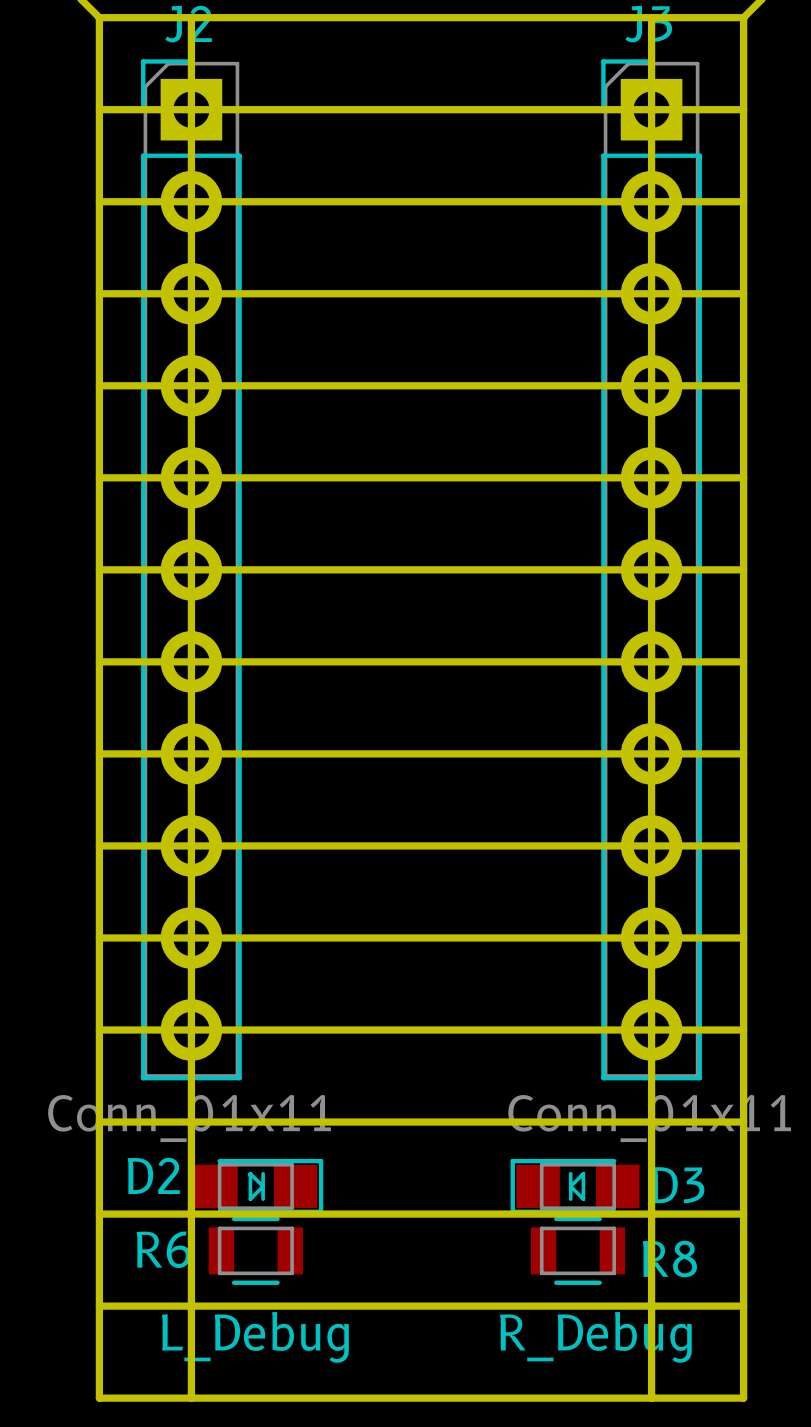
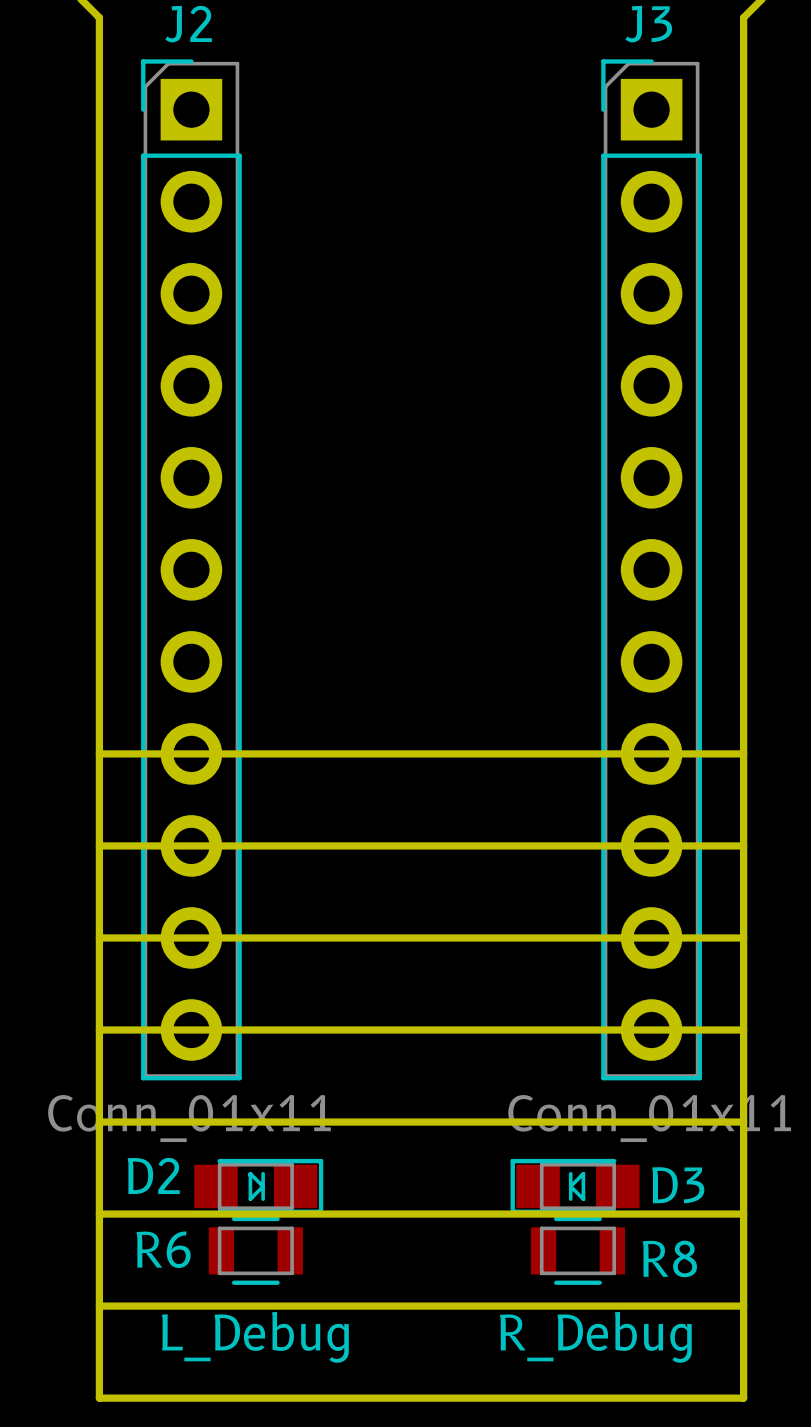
board edge: (99, 17) (743, 17) -> none
board edge: (191, 17) (191, 1398) -> none
board edge: (651, 17) (651, 1398) -> none
board edge: (99, 109) (743, 109) -> none
board edge: (99, 201) (743, 201) -> none
board edge: (99, 293) (743, 293) -> none
board edge: (99, 385) (743, 385) -> none
board edge: (99, 477) (743, 477) -> none
board edge: (99, 569) (743, 569) -> none
board edge: (99, 661) (743, 661) -> none

